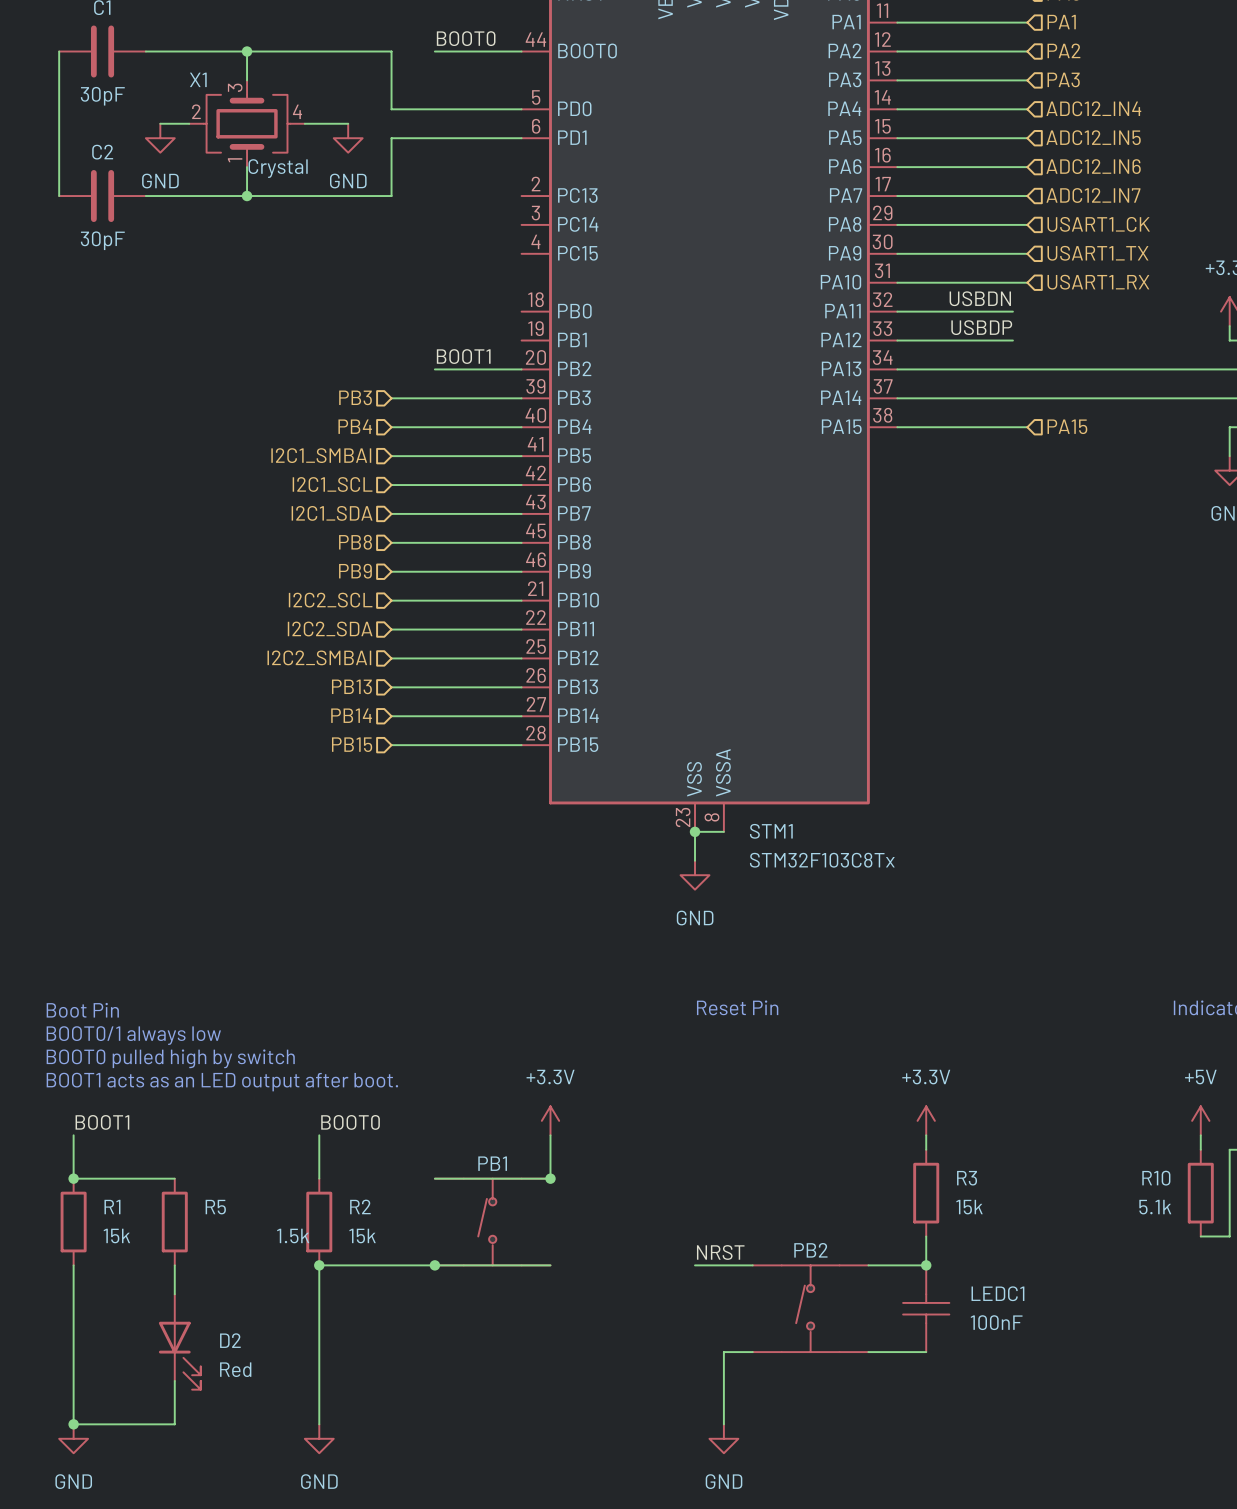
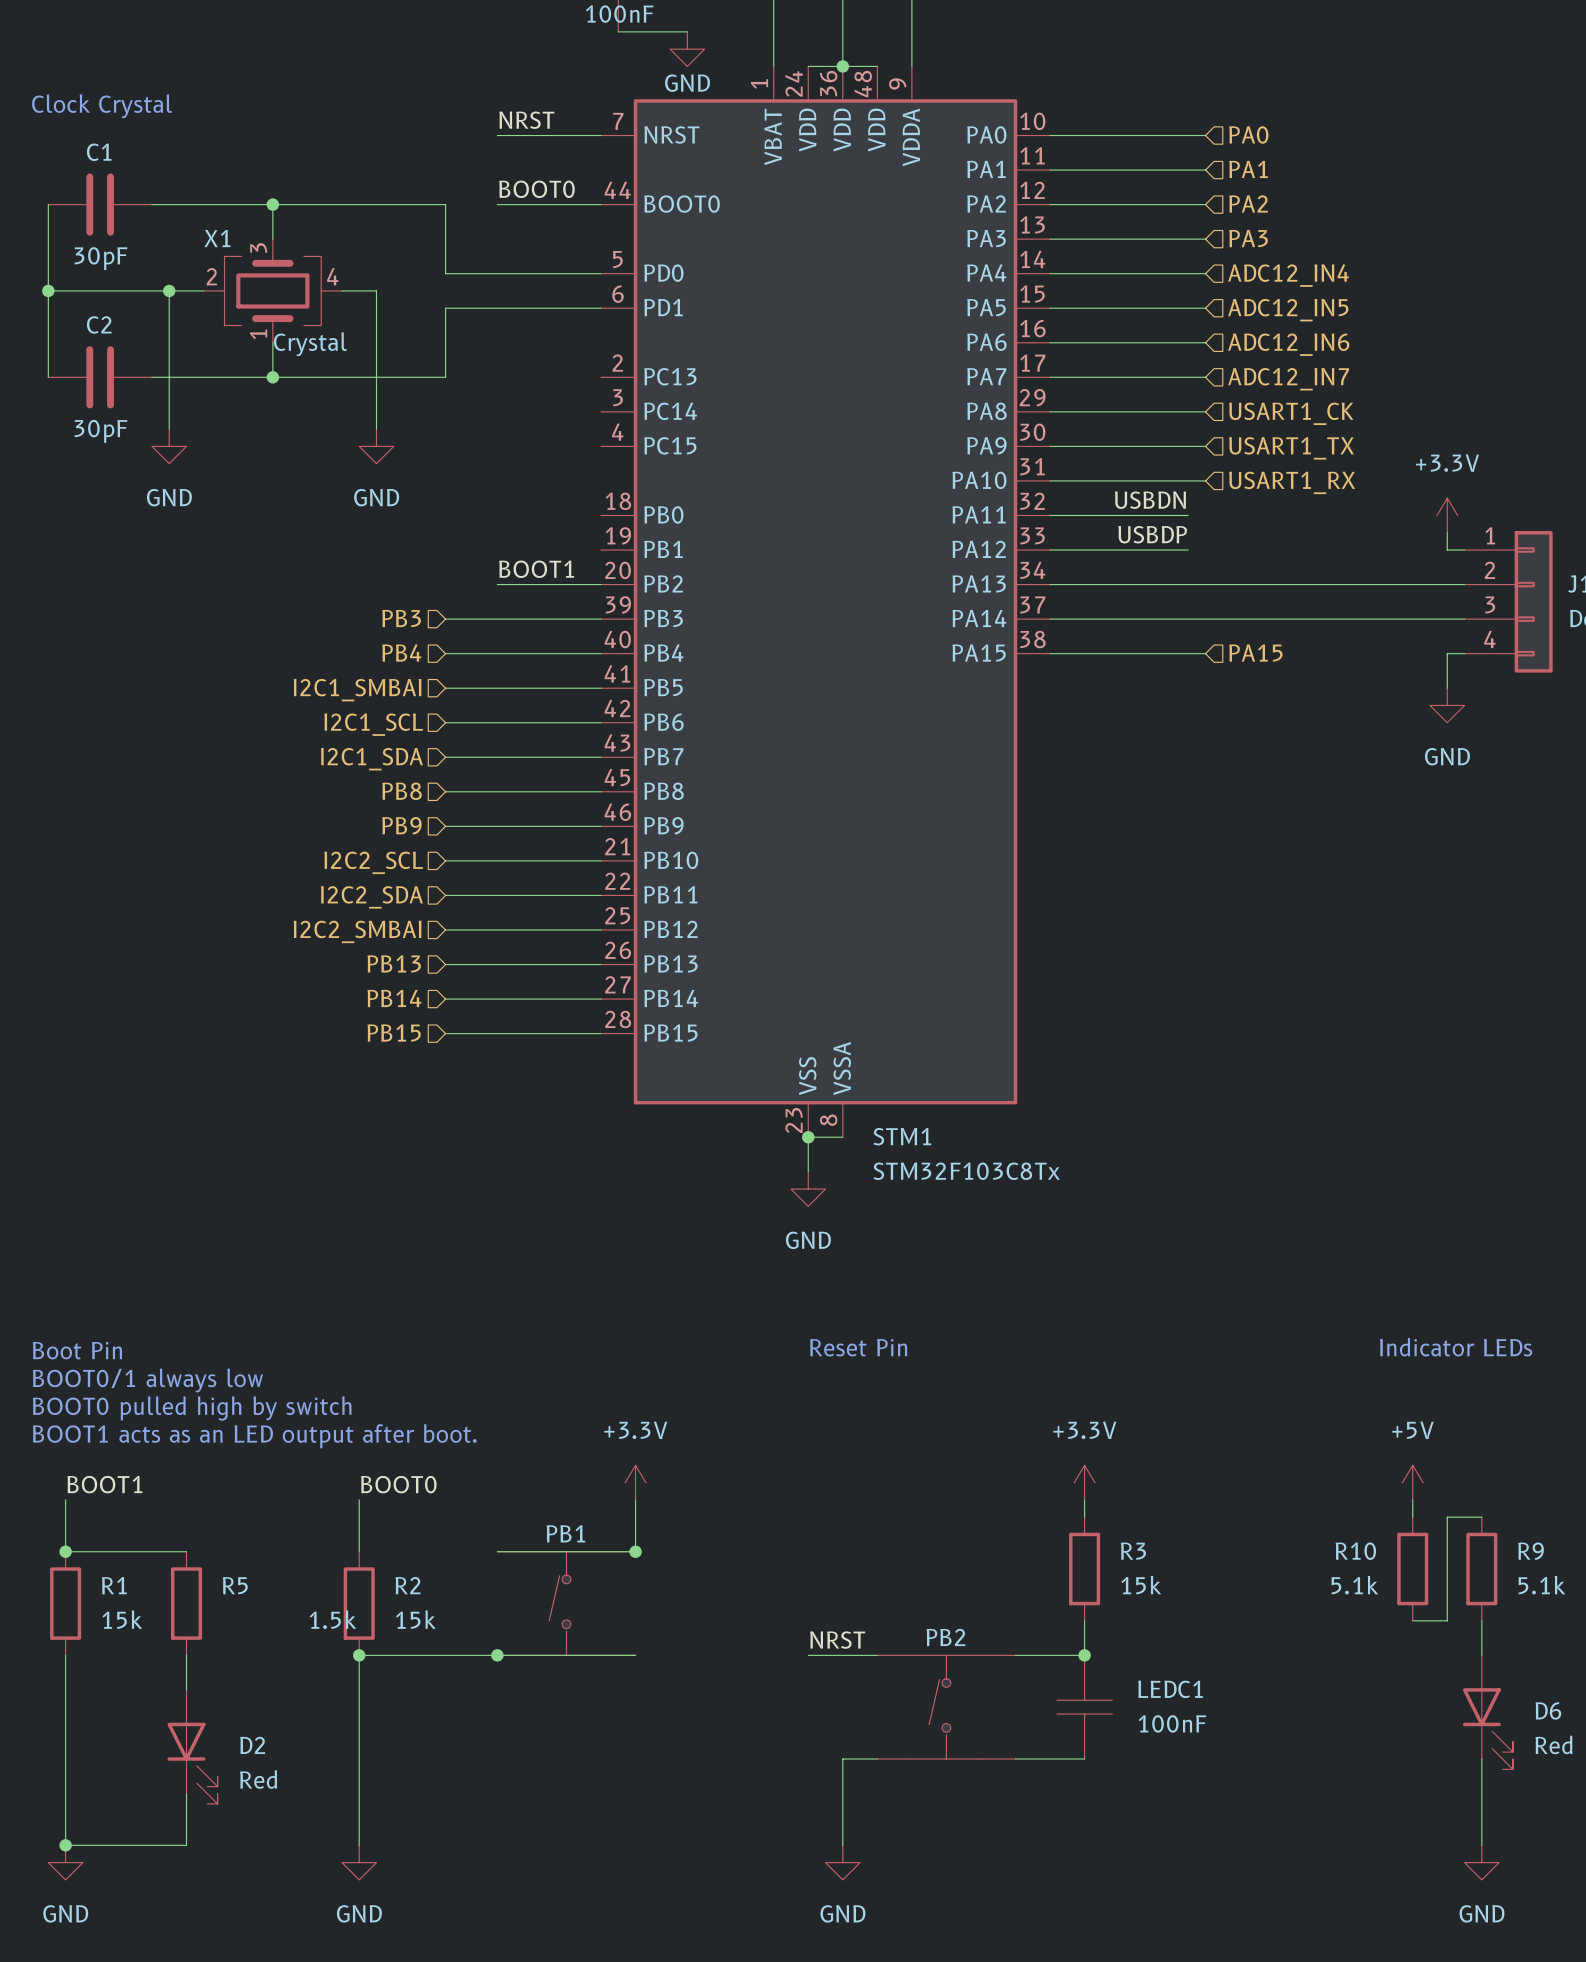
wire: none -> (48, 290) (169, 290) (169, 429)
junction: none -> (48, 290)
junction: none -> (169, 290)
wire: (333, 123) (348, 123) -> (376, 290) (376, 429)
power symbol: GND (160, 138) -> none
power symbol: GND (348, 138) -> none
power symbol: none -> GND (169, 446)
power symbol: none -> GND (376, 446)

